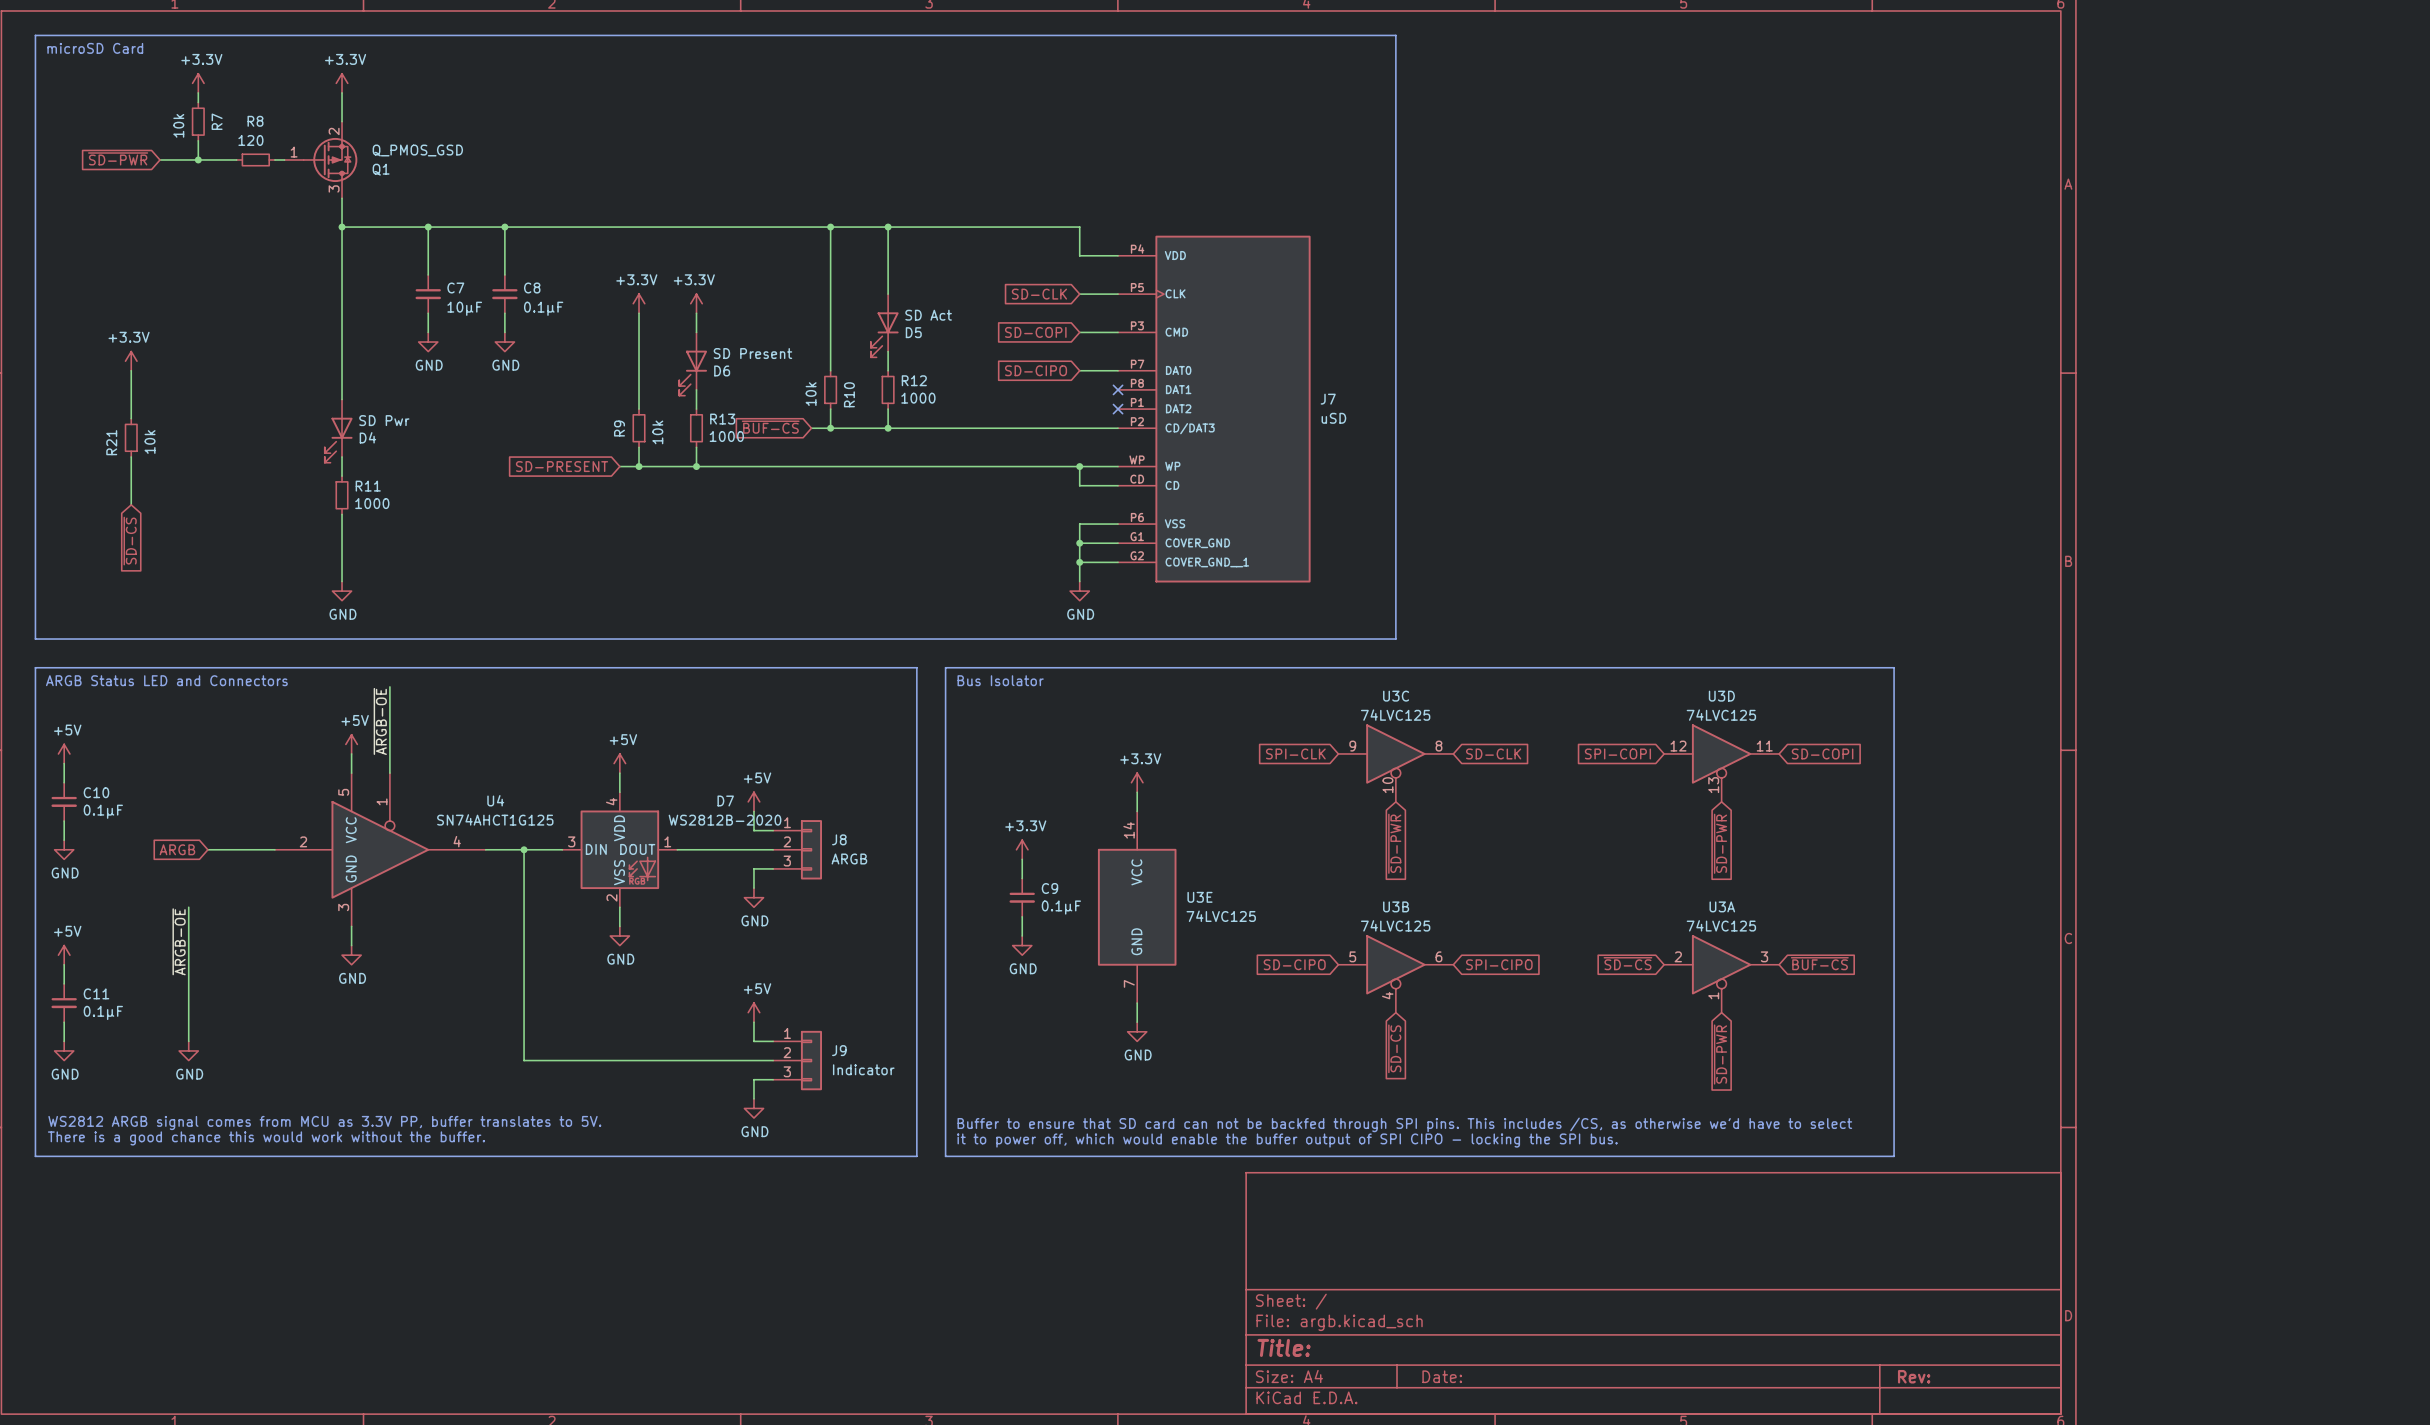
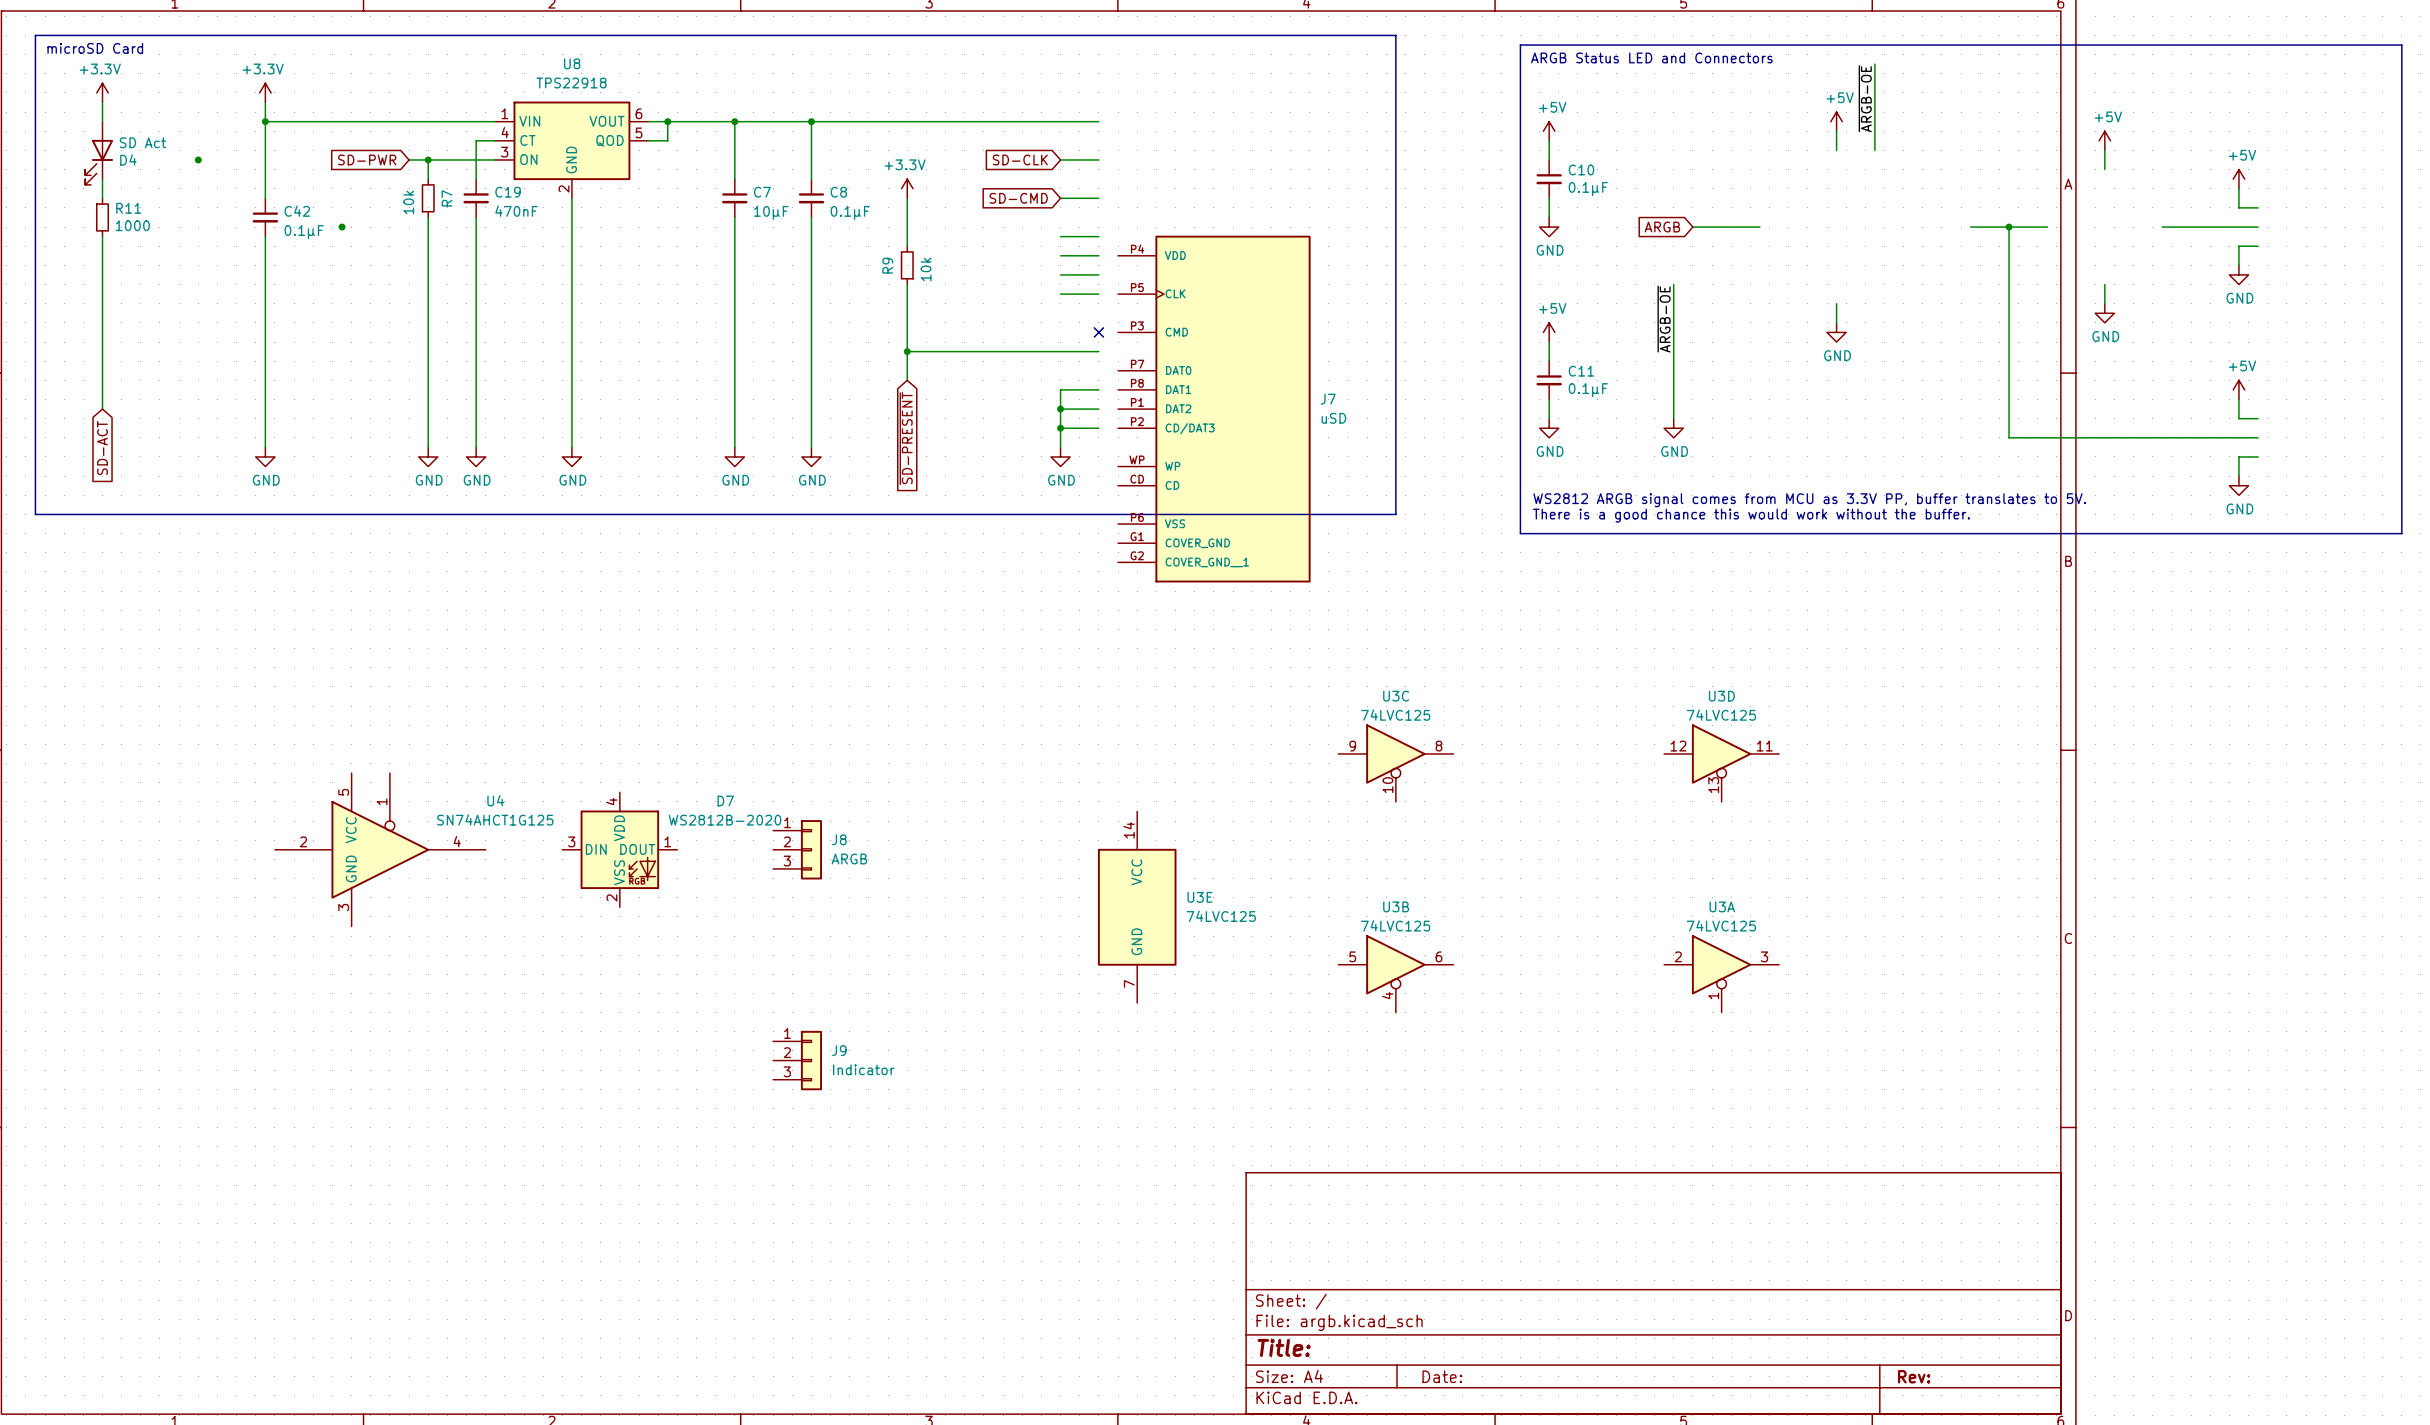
line: none -> (1520, 45) (2401, 45) (2401, 533) (1520, 533) (1520, 45)
text: none -> ARGB Status LED and Connectors (1651, 57)
wire: none -> (1874, 64) (1874, 150)
power symbol: +3.3V (198, 83) -> none
power symbol: +3.3V (342, 83) -> none
power symbol: none -> +3.3V (102, 92)
wire: (198, 92) (198, 102) -> none
power symbol: none -> +3.3V (265, 92)
wire: (342, 92) (342, 121) -> none
label: none -> ~{ARGB-OE} (1865, 98)
wire: none -> (265, 102) (265, 198)
R7 position: (198, 121) -> (428, 198)
wire: none -> (265, 121) (495, 121)
junction: none -> (265, 121)
wire: none -> (648, 121) (1098, 121)
wire: none -> (667, 121) (667, 140) (648, 140)
junction: none -> (667, 121)
wire: none -> (734, 121) (734, 179)
junction: none -> (734, 121)
wire: none -> (811, 121) (811, 179)
junction: none -> (811, 121)
power symbol: none -> +5V (1836, 121)
power symbol: none -> +5V (1549, 131)
wire: none -> (1836, 131) (1836, 150)
wire: (198, 140) (198, 159) -> (102, 102) (102, 121)
wire: none -> (495, 140) (476, 140) (476, 179)
wire: none -> (1549, 140) (1549, 159)
power symbol: none -> +5V (2104, 140)
U8: none -> TPS22918 (571, 149)
wire: none -> (2104, 150) (2104, 169)
global label: ~{SD-PWR} (118, 158) -> none
wire: (159, 159) (236, 159) -> none
R8: 120 (255, 159) -> none
wire: (274, 159) (284, 159) -> none
Q1: Q_PMOS_GSD (320, 159) -> none
global label: none -> SD-PWR (367, 159)
wire: none -> (409, 159) (495, 159)
junction: none -> (428, 159)
wire: none -> (1060, 159) (1098, 159)
wire: none -> (102, 179) (102, 198)
power symbol: none -> +5V (2238, 179)
power symbol: none -> +3.3V (907, 188)
wire: none -> (2238, 188) (2238, 207) (2258, 207)
wire: (342, 198) (342, 399) -> none
C19: none -> 470nF (476, 198)
wire: none -> (571, 198) (571, 447)
wire: none -> (907, 198) (907, 246)
global label: none -> SD-CMD (1018, 198)
wire: none -> (1549, 198) (1549, 217)
C42: none -> 0.1μF (265, 217)
wire: none -> (428, 217) (428, 227)
wire: none -> (476, 217) (476, 447)
wire: none -> (734, 217) (734, 447)
wire: none -> (811, 217) (811, 447)
wire: (342, 227) (1079, 227) (1079, 255) -> (1060, 255) (1079, 255)
junction: (428, 227) -> none
wire: (504, 227) (504, 274) -> none
junction: (504, 227) -> none
wire: (830, 227) (830, 370) -> none
junction: (830, 227) -> none
wire: (888, 227) (888, 294) -> none
junction: (888, 227) -> none
power symbol: none -> GND (1549, 227)
global label: none -> ARGB (1662, 227)
wire: none -> (1692, 227) (1759, 227)
wire: none -> (1970, 227) (2047, 227)
wire: none -> (2009, 227) (2009, 437) (2258, 437)
junction: none -> (2009, 227)
wire: none -> (2162, 227) (2258, 227)
wire: none -> (102, 236) (102, 409)
wire: none -> (265, 236) (265, 447)
wire: none -> (2258, 246) (2238, 246) (2238, 265)
wire: (1098, 255) (1118, 255) -> none
wire: none -> (1060, 274) (1098, 274)
power symbol: none -> GND (2238, 274)
wire: none -> (907, 284) (907, 380)
wire: none -> (1673, 284) (1673, 418)
wire: none -> (2104, 284) (2104, 303)
C7 position: (428, 294) -> (734, 198)
C8 position: (504, 294) -> (811, 198)
global label position: SD-CLK (1039, 294) -> SD-CLK (1020, 159)
wire: (1098, 294) (1118, 294) -> (1060, 294) (1079, 294)
power symbol: +3.3V (639, 303) -> none
power symbol: +3.3V (696, 303) -> none
wire: none -> (1836, 303) (1836, 322)
wire: (504, 313) (504, 332) -> (428, 159) (428, 179)
wire: (639, 313) (639, 409) -> none
wire: (696, 313) (696, 332) -> none
power symbol: none -> GND (2104, 313)
label: none -> ~{ARGB-OE} (1664, 319)
D5: SD Act (884, 325) -> none
wire: none -> (428, 332) (428, 447)
global label: SD-COPI (1035, 332) -> none
wire: (1079, 332) (1118, 332) -> (1060, 198) (1098, 198)
no-connect mark: none -> (1098, 332)
power symbol: none -> +5V (1549, 332)
power symbol: none -> GND (1836, 332)
power symbol: GND (428, 342) -> none
power symbol: GND (504, 342) -> none
wire: none -> (1549, 342) (1549, 361)
wire: (888, 351) (888, 370) -> none
wire: none -> (907, 351) (1098, 351)
junction: none -> (907, 351)
power symbol: +3.3V (131, 361) -> none
D6: SD Present (693, 364) -> none
wire: (131, 370) (131, 418) -> none
global label: SD-CIPO (1036, 370) -> none
wire: (1079, 370) (1118, 370) -> (1060, 236) (1098, 236)
wire: (696, 389) (696, 409) -> none
R10: 10k (830, 389) -> none
R12: 1000 (888, 389) -> none
no-connect mark: (1118, 389) -> none
power symbol: none -> +5V (2238, 389)
wire: none -> (1549, 399) (1549, 418)
wire: none -> (2238, 399) (2238, 418) (2258, 418)
wire: (830, 409) (830, 428) -> none
wire: (888, 409) (888, 428) -> none
junction: none -> (1060, 409)
no-connect mark: (1118, 409) -> none
D4 value: SD Pwr (384, 420) -> SD Act (142, 142)
global label: ~{BUF-CS} (770, 427) -> none
R9 position: (639, 428) -> (907, 265)
R13: 1000 (696, 428) -> none
wire: (811, 428) (1060, 428) -> none
junction: (830, 428) -> none
junction: (888, 428) -> none
junction: none -> (1060, 428)
wire: (1098, 428) (1118, 428) -> none
power symbol: none -> GND (1549, 428)
power symbol: none -> GND (1673, 428)
D4 position: (338, 431) -> (99, 153)
R21: 10k (131, 437) -> none
global label: none -> ~{SD-PRESENT} (906, 438)
global label: none -> SD-ACT (102, 447)
wire: (639, 447) (639, 466) -> none
wire: (696, 447) (696, 466) -> none
wire: (131, 456) (131, 504) -> none
power symbol: none -> GND (265, 456)
wire: (342, 456) (342, 476) -> none
power symbol: none -> GND (428, 456)
power symbol: none -> GND (476, 456)
power symbol: none -> GND (571, 456)
power symbol: none -> GND (734, 456)
power symbol: none -> GND (811, 456)
wire: none -> (2258, 456) (2238, 456) (2238, 476)
global label: SD-PRESENT (562, 466) -> none
wire: (619, 466) (1118, 466) -> none
junction: (639, 466) -> none
junction: (696, 466) -> none
wire: (1079, 466) (1079, 485) (1118, 485) -> none
junction: (1079, 466) -> none
power symbol: none -> GND (2238, 485)
R11 position: (342, 495) -> (102, 217)
text: none -> WS2812 ARGB signal comes from MCU as 3.3V PP, buffer translates to 5V. (1809, 500)
line: (35, 514) (35, 639) (1395, 639) (1395, 514) -> (35, 514) (1395, 514)
wire: (342, 514) (342, 581) -> none
text: none -> There is a good chance this would work without the buffer. (1751, 515)
wire: (1118, 524) (1079, 524) (1079, 581) -> (1098, 389) (1060, 389) (1060, 447)
global label: ~{SD-CS} (130, 541) -> none
wire: (1079, 543) (1118, 543) -> (1060, 409) (1098, 409)
junction: (1079, 543) -> none
wire: (1079, 562) (1118, 562) -> none
junction: (1079, 562) -> none
power symbol: GND (342, 591) -> none
power symbol position: GND (1079, 591) -> GND (1060, 456)
line: (35, 667) (916, 667) (916, 1156) (35, 1156) (35, 667) -> none
line: (945, 667) (1894, 667) (1894, 1156) (945, 1156) (945, 667) -> none
text: ARGB Status LED and Connectors (166, 680) -> none
text: Bus Isolator (1000, 680) -> none
wire: (389, 686) (389, 773) -> none
label: ~{ARGB-OE} (380, 721) -> none
power symbol: +5V (351, 744) -> none
power symbol: +5V (64, 753) -> none
wire: (351, 753) (351, 773) -> none
global label: SPI-CLK (1295, 753) -> none
global label: SD-CLK (1493, 753) -> none
global label: SPI-COPI (1617, 753) -> none
global label: SD-COPI (1822, 753) -> none
wire: (64, 763) (64, 782) -> none
power symbol: +5V (619, 763) -> none
wire: (619, 773) (619, 792) -> none
power symbol: +3.3V (1137, 782) -> none
wire: (1137, 792) (1137, 811) -> none
C10 position: (64, 801) -> (1549, 179)
power symbol: +5V (753, 801) -> none
wire: (753, 811) (753, 830) (773, 830) -> none
wire: (64, 821) (64, 840) -> none
global label: ~{SD-PWR} (1394, 843) -> none
global label: ~{SD-PWR} (1720, 843) -> none
power symbol: GND (64, 849) -> none
global label: ARGB (177, 849) -> none
wire: (207, 849) (274, 849) -> none
wire: (485, 849) (562, 849) -> none
wire: (524, 849) (524, 1060) (773, 1060) -> none
junction: (524, 849) -> none
wire: (677, 849) (773, 849) -> none
power symbol: +3.3V (1022, 849) -> none
wire: (1022, 859) (1022, 878) -> none
wire: (773, 868) (753, 868) (753, 888) -> none
power symbol: GND (753, 897) -> none
C9: 0.1μF (1022, 897) -> none
wire: (188, 907) (188, 1041) -> none
wire: (619, 907) (619, 926) -> none
wire: (1022, 916) (1022, 936) -> none
wire: (351, 926) (351, 945) -> none
power symbol: GND (619, 936) -> none
label: ~{ARGB-OE} (179, 941) -> none
power symbol: GND (1022, 945) -> none
power symbol: +5V (64, 955) -> none
power symbol: GND (351, 955) -> none
global label: ~{SD-CS} (1627, 963) -> none
global label: ~{BUF-CS} (1819, 963) -> none
wire: (64, 964) (64, 983) -> none
global label: SD-CIPO (1294, 964) -> none
global label: SPI-CIPO (1499, 964) -> none
C11 position: (64, 1003) -> (1549, 380)
wire: (1137, 1003) (1137, 1022) -> none
power symbol: +5V (753, 1012) -> none
wire: (64, 1022) (64, 1041) -> none
wire: (753, 1022) (753, 1041) (773, 1041) -> none
power symbol: GND (1137, 1031) -> none
global label: ~{SD-CS} (1394, 1048) -> none
power symbol: GND (64, 1050) -> none
power symbol: GND (188, 1050) -> none
global label: ~{SD-PWR} (1720, 1054) -> none
wire: (773, 1079) (753, 1079) (753, 1098) -> none
power symbol: GND (753, 1108) -> none
text: WS2812 ARGB signal comes from MCU as 3.3V PP, buffer translates to 5V. (324, 1122) -> none
text: Buffer to ensure that SD card can not be backfed through SPI pins. This includes /CS, as otherwise we'd have to select (1404, 1124) -> none
text: There is a good chance this would work without the buffer. (266, 1138) -> none
text: it to power off, which would enable the buffer output of SPI CIPO - locking the SPI bus. (1287, 1140) -> none

